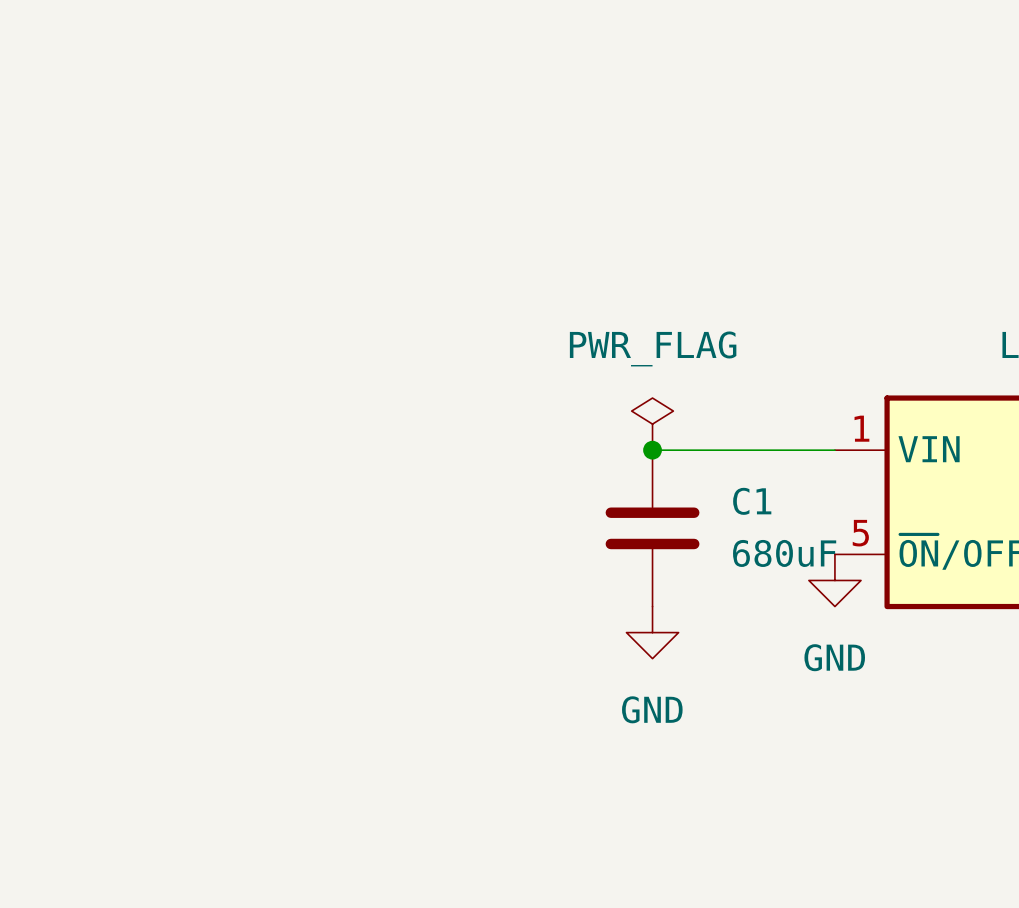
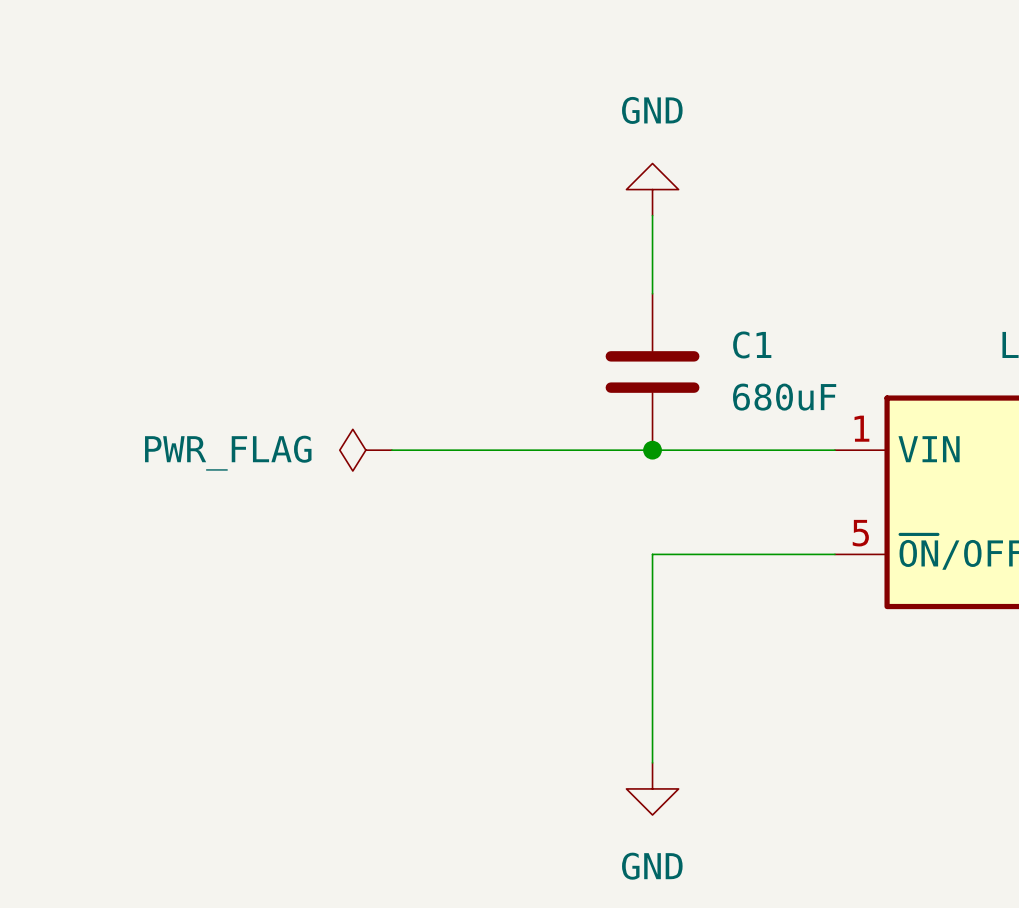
power symbol: none -> GND (652, 189)
wire: none -> (652, 215) (652, 293)
power symbol text position: PWR_FLAG (653, 348) -> PWR_FLAG (228, 453)
power symbol rotation: 0° (652, 424) -> 90° counterclockwise (365, 450)
power symbol position: PWR_FLAG (652, 424) -> PWR_FLAG (365, 450)
wire: none -> (391, 450) (652, 450)
C1 position: (652, 528) -> (652, 371)
wire: none -> (834, 554) (652, 554) (652, 762)
power symbol: GND (834, 580) -> none
power symbol: GND (652, 632) -> none
power symbol: none -> GND (652, 788)

